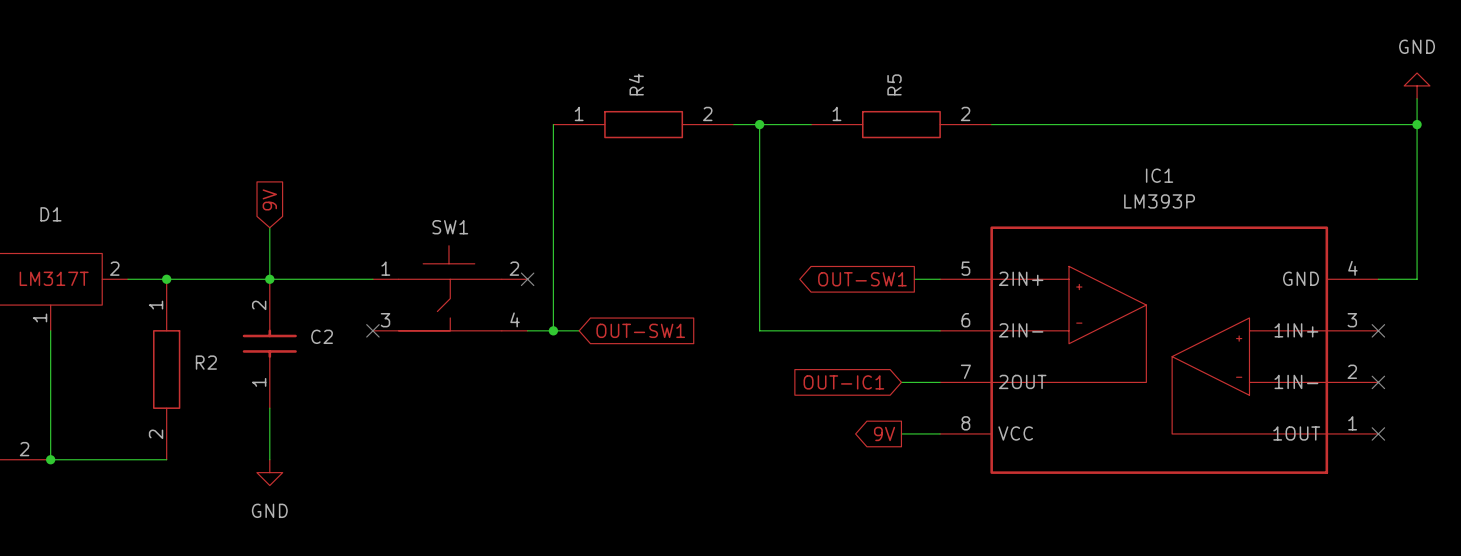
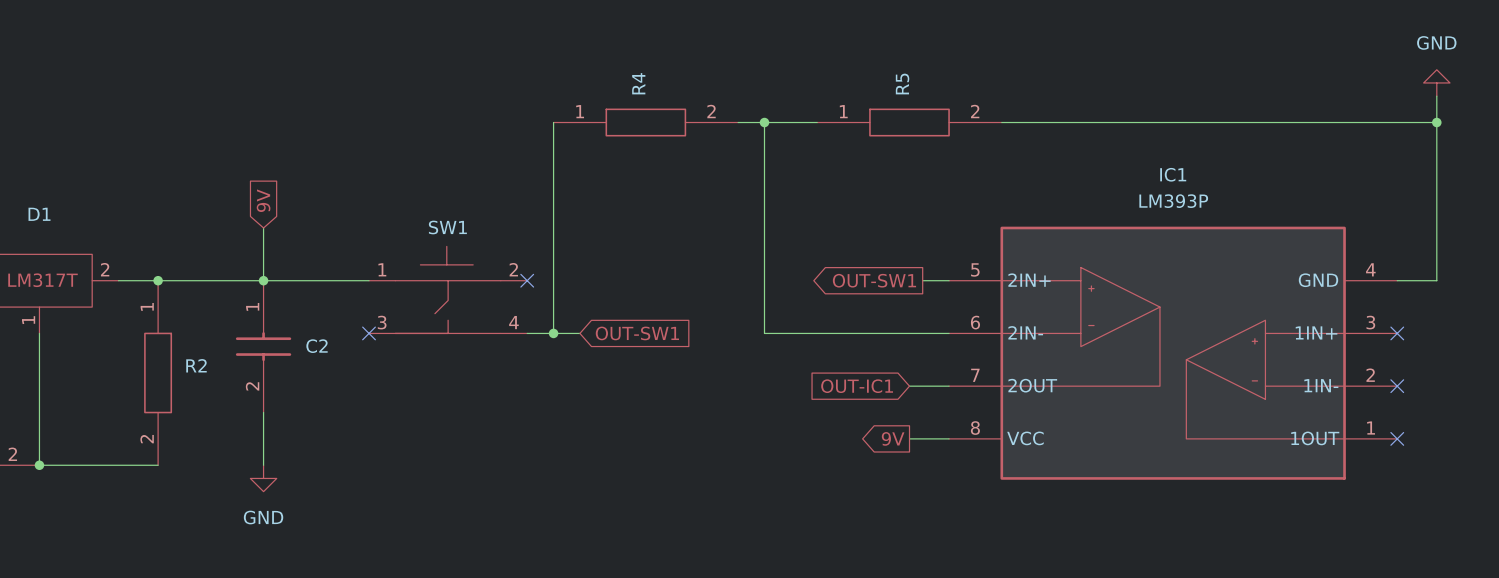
C2 rotation: 0° (269, 343) -> 180° (263, 346)

